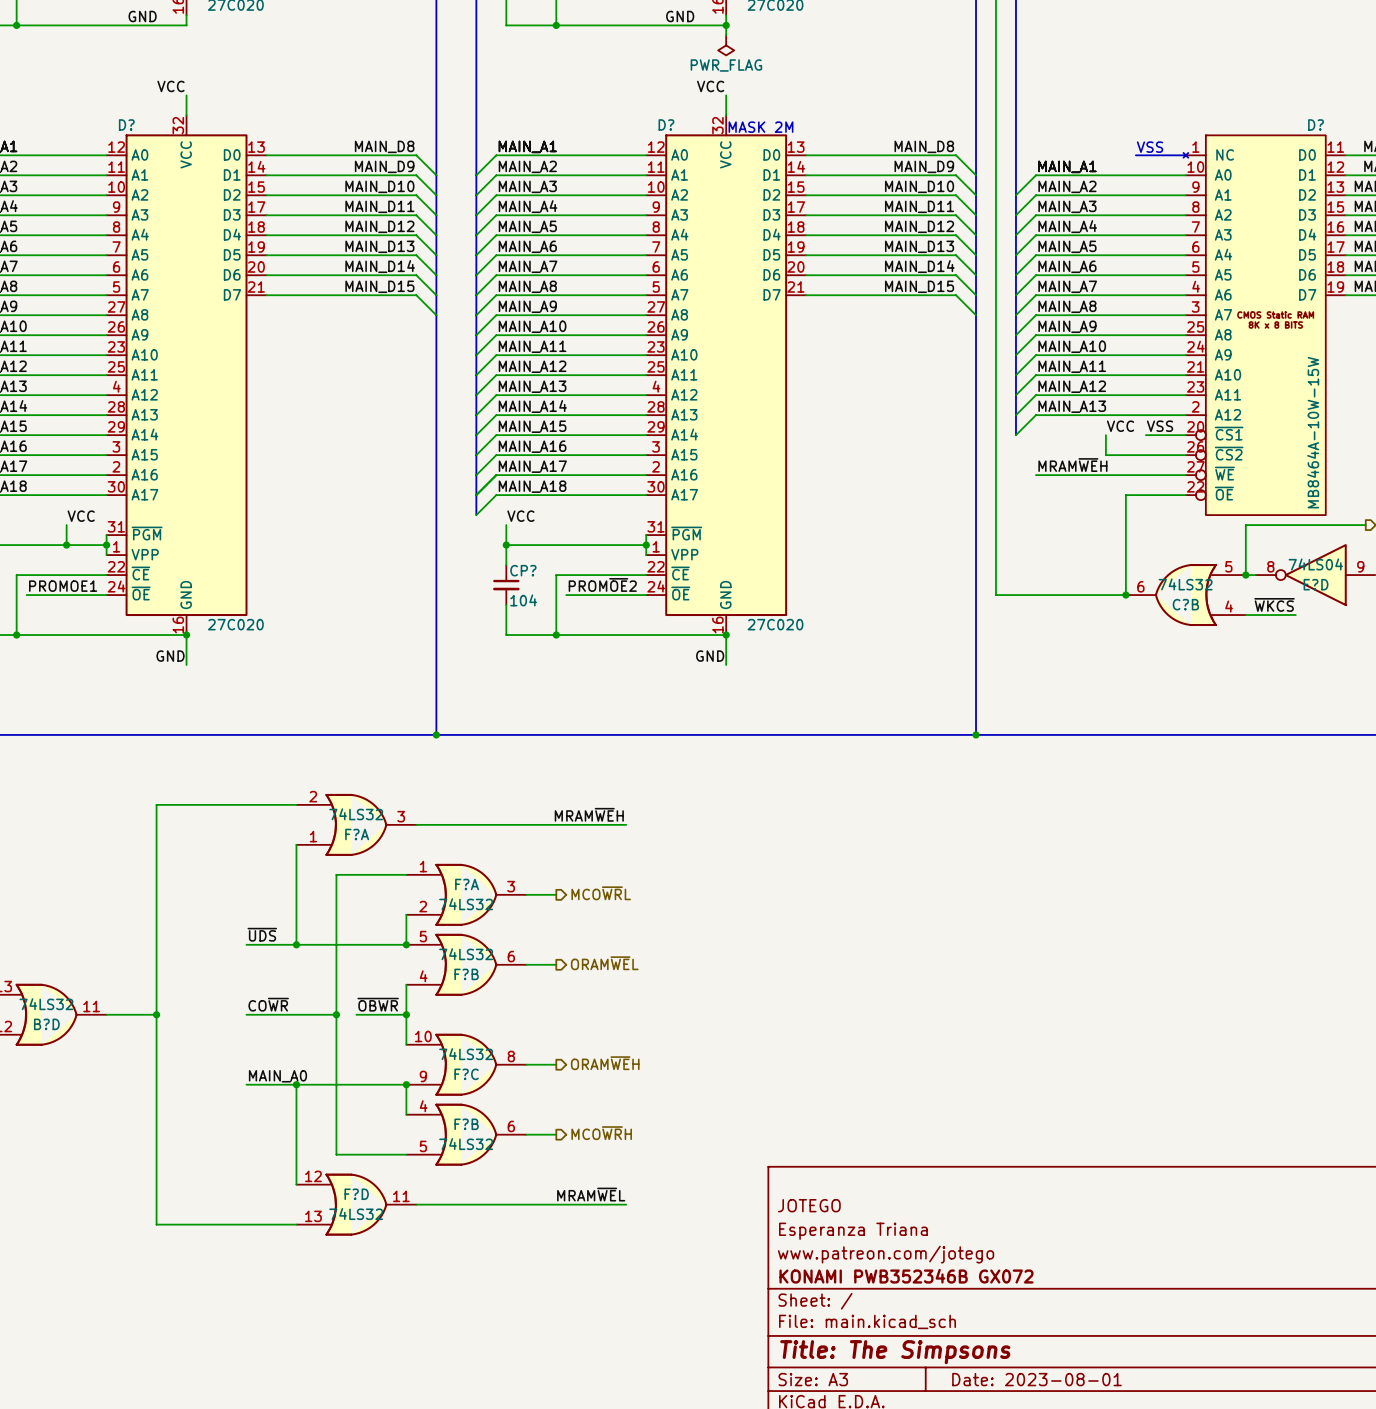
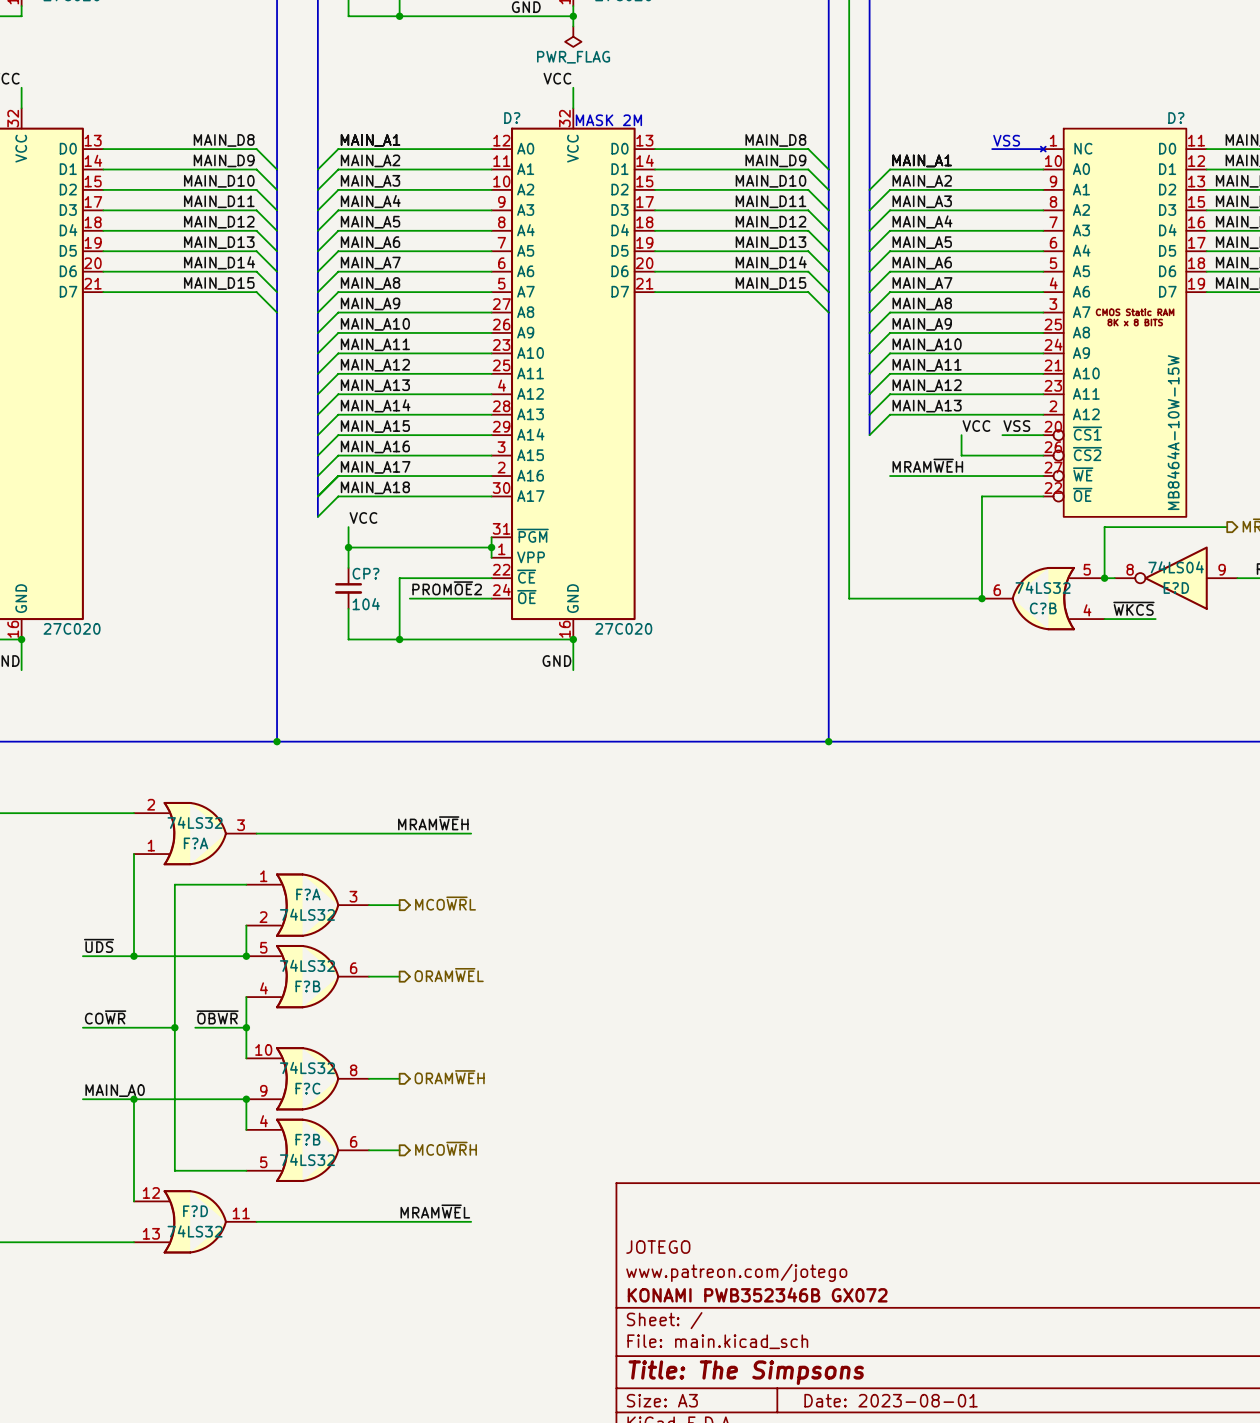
title block: JOTEGO (809, 1205) -> none
title block: Esperanza Triana (853, 1231) -> JOTEGO (658, 1247)

